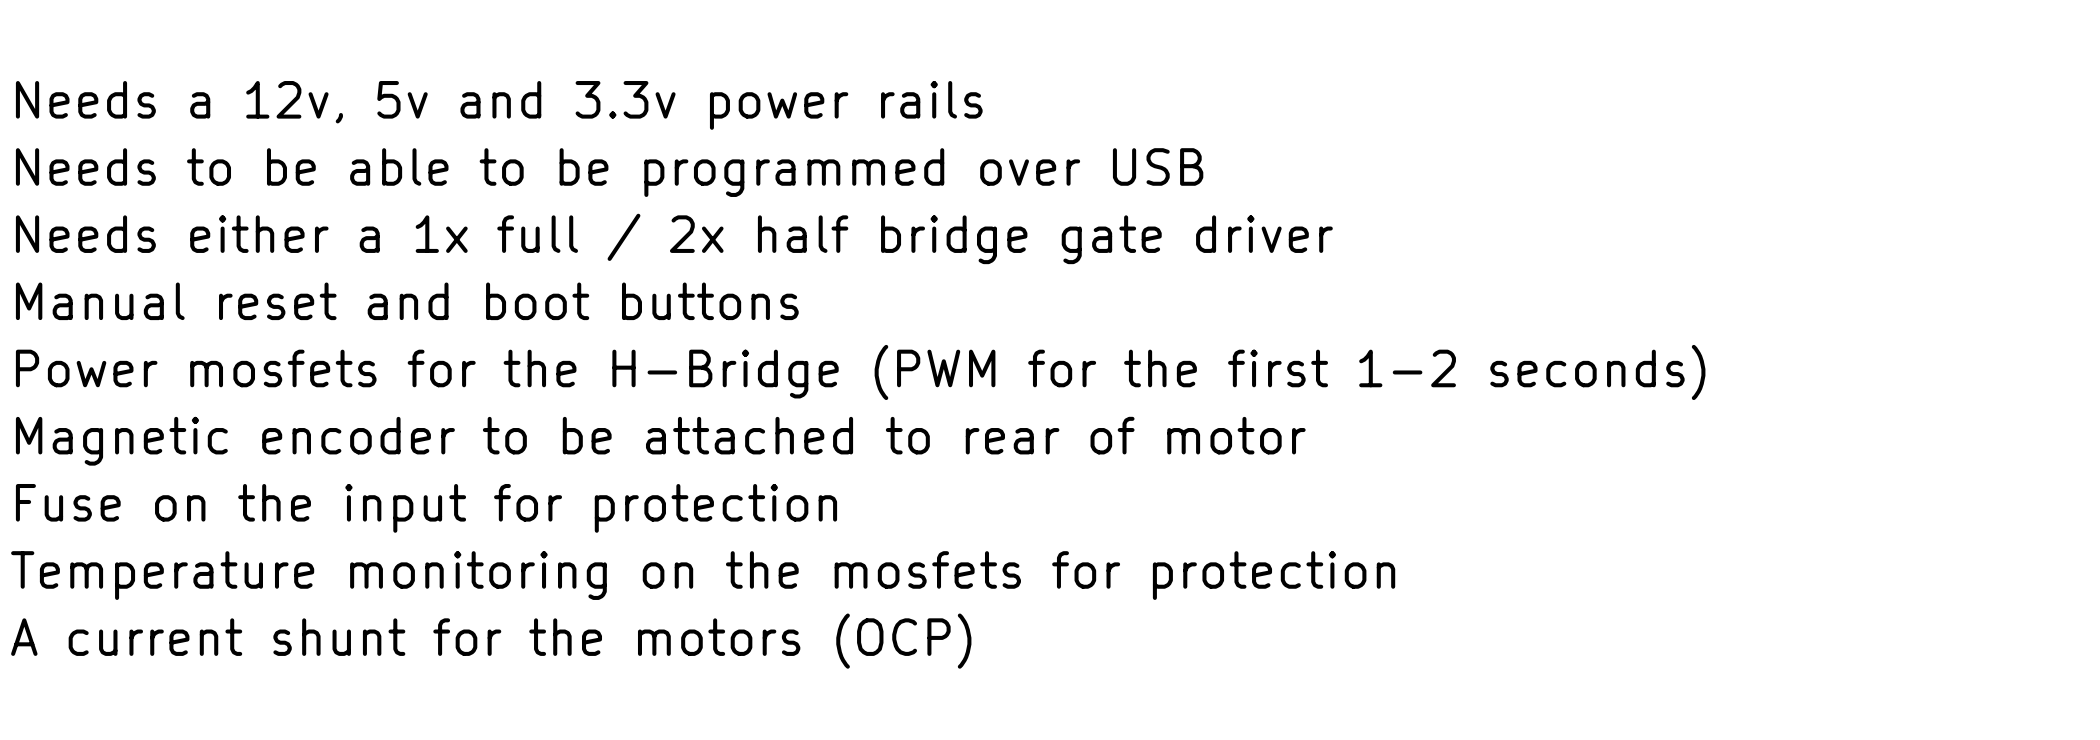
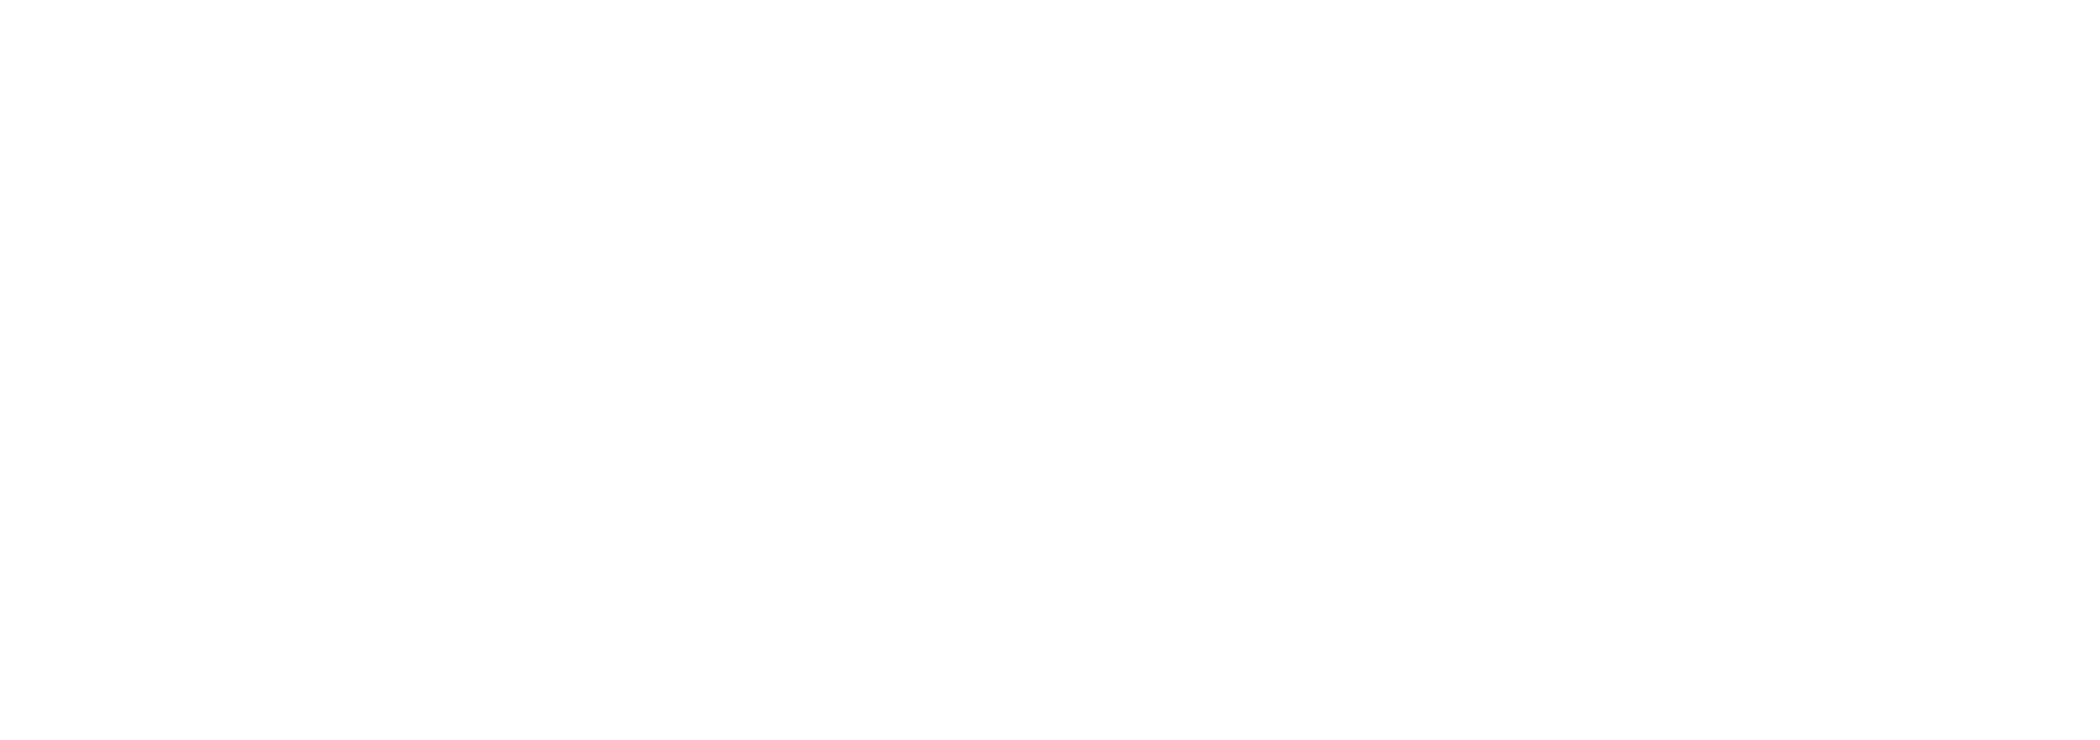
label: Needs a 12v, 5v and 3.3v power rails (499, 105) -> none
label: Needs to be able to be programmed over USB (609, 172) -> none
label: Needs either a 1x full / 2x half bridge gate driver (674, 238) -> none
label: Manual reset and boot buttons (407, 301) -> none
label: Power mosfets for the H-Bridge (PWM for the first 1-2 seconds) (860, 372) -> none
label: Magnetic encoder to be attached to rear of motor (660, 441) -> none
label: Fuse on the input for protection (426, 508) -> none
label: Temperature monitoring on the mosfets for protection (703, 575) -> none
label: A current shunt for the motors (OCP) (491, 641) -> none

